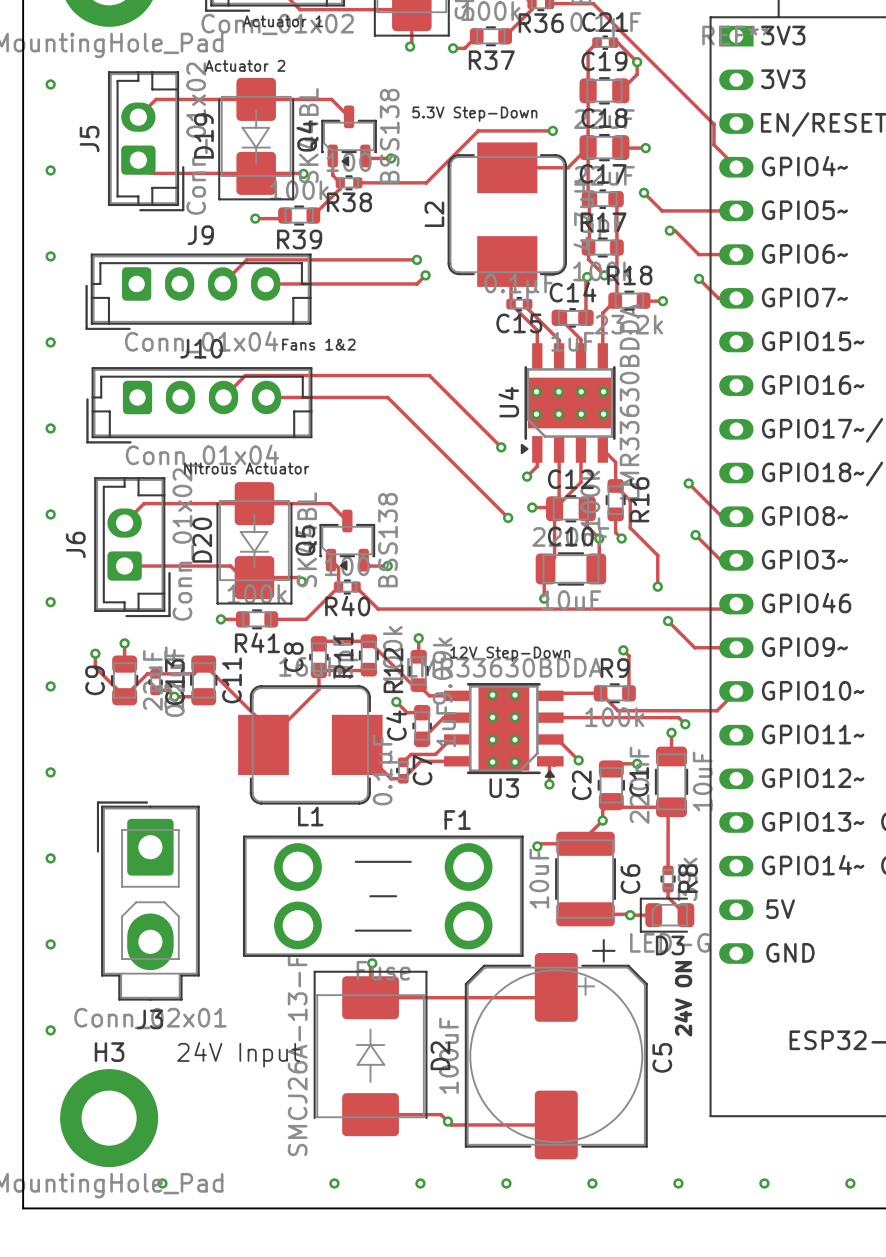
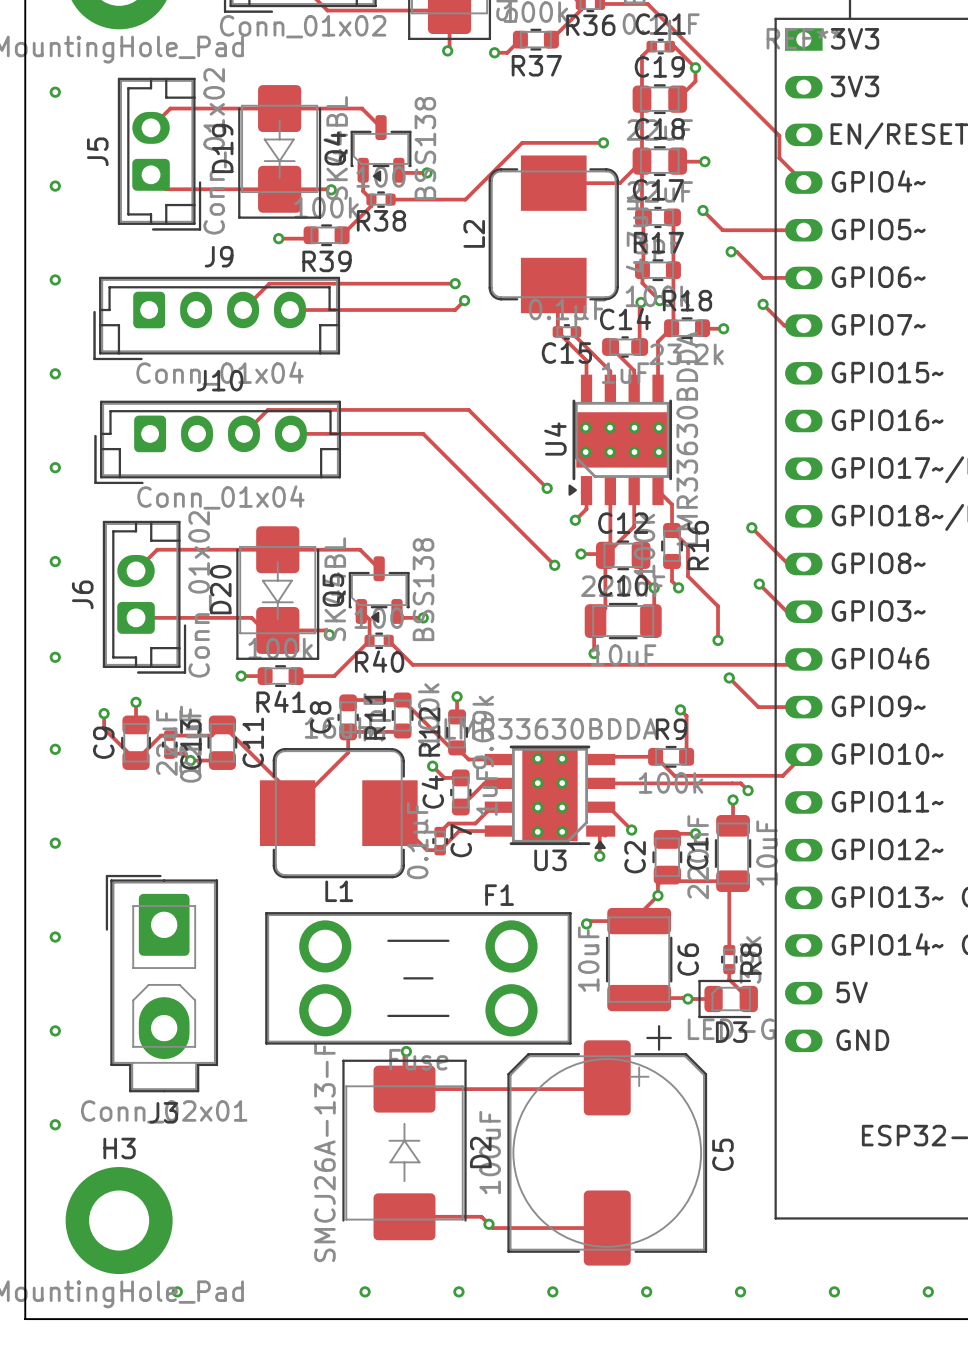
text: Actuator 1 (282, 21) -> none
text: Actuator 2 (245, 65) -> none
text: 5.3V Step-Down (474, 114) -> none
text: Fans 1&2 (318, 344) -> none
text: Nitrous Actuator (246, 468) -> none
text: 12V Step-Down (510, 654) -> none
text: 24V ON (683, 998) -> none
text: 24V Input (238, 1054) -> none

